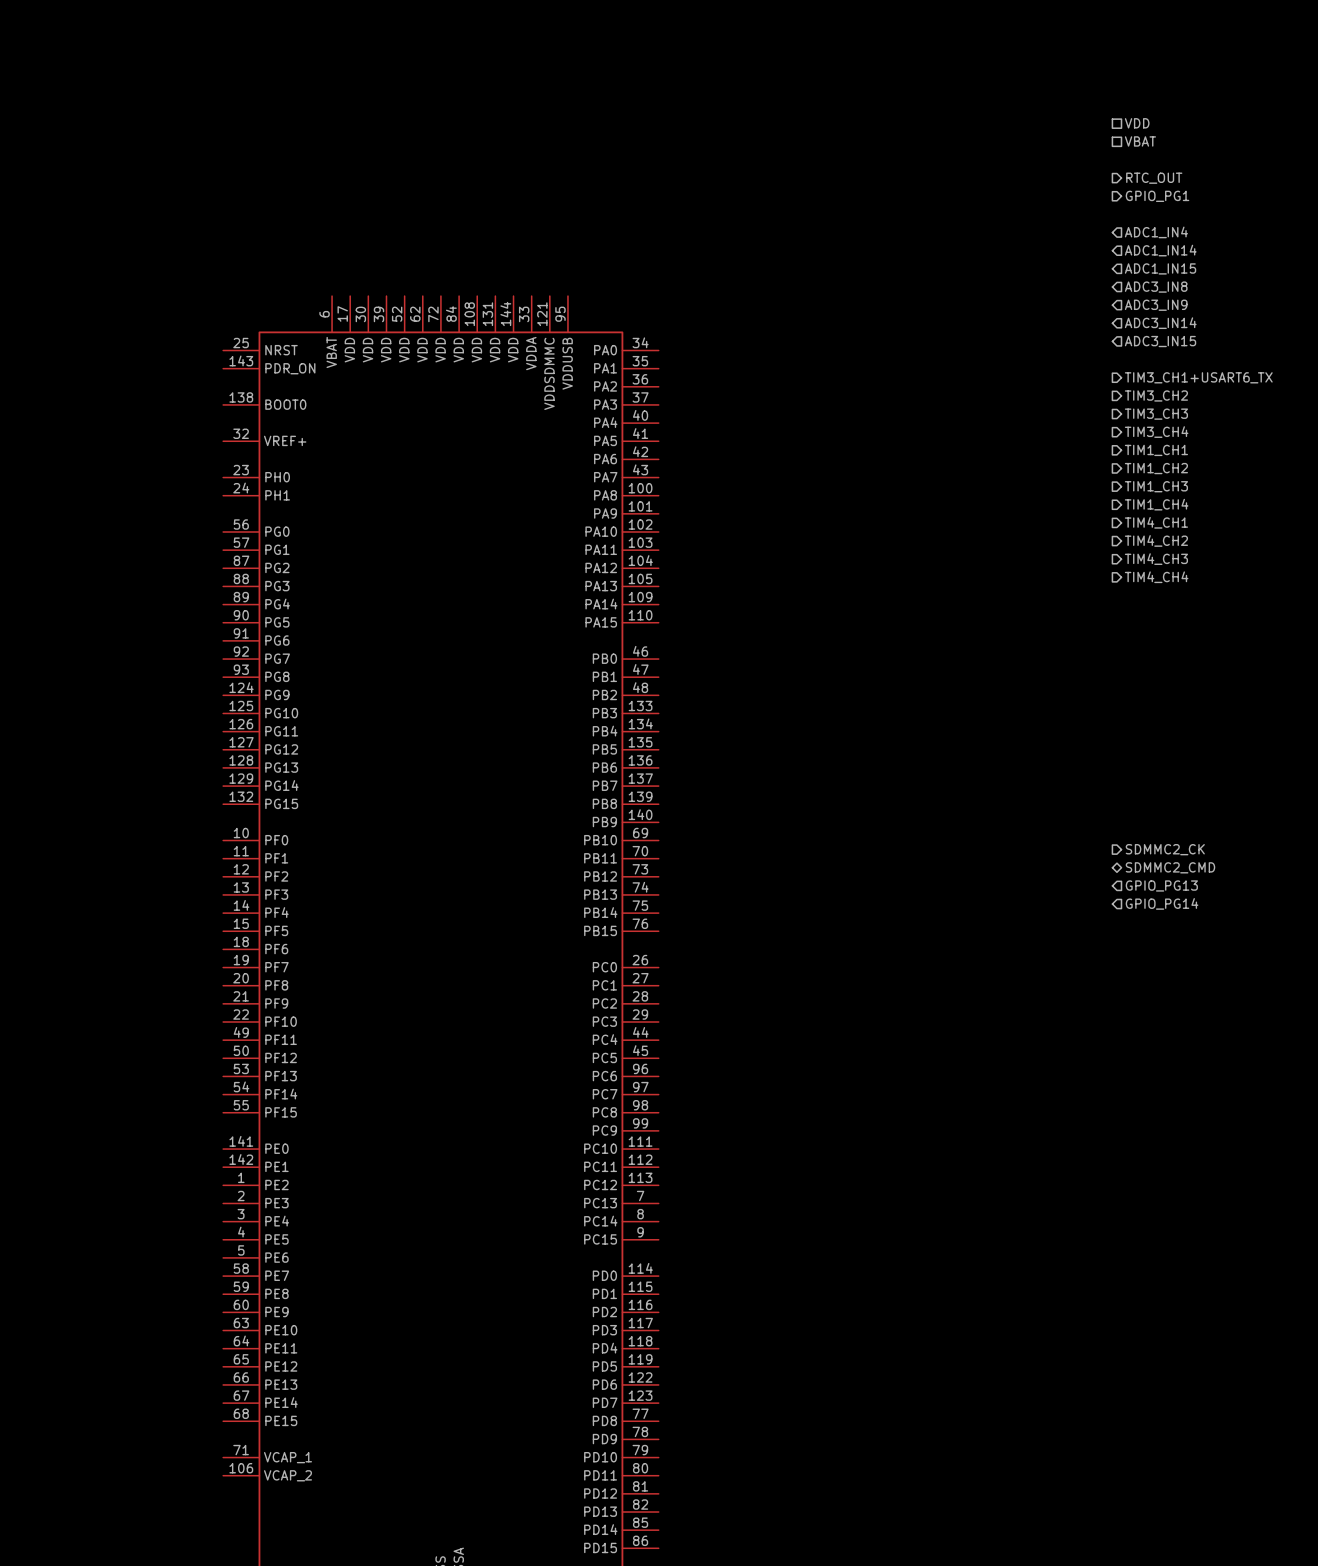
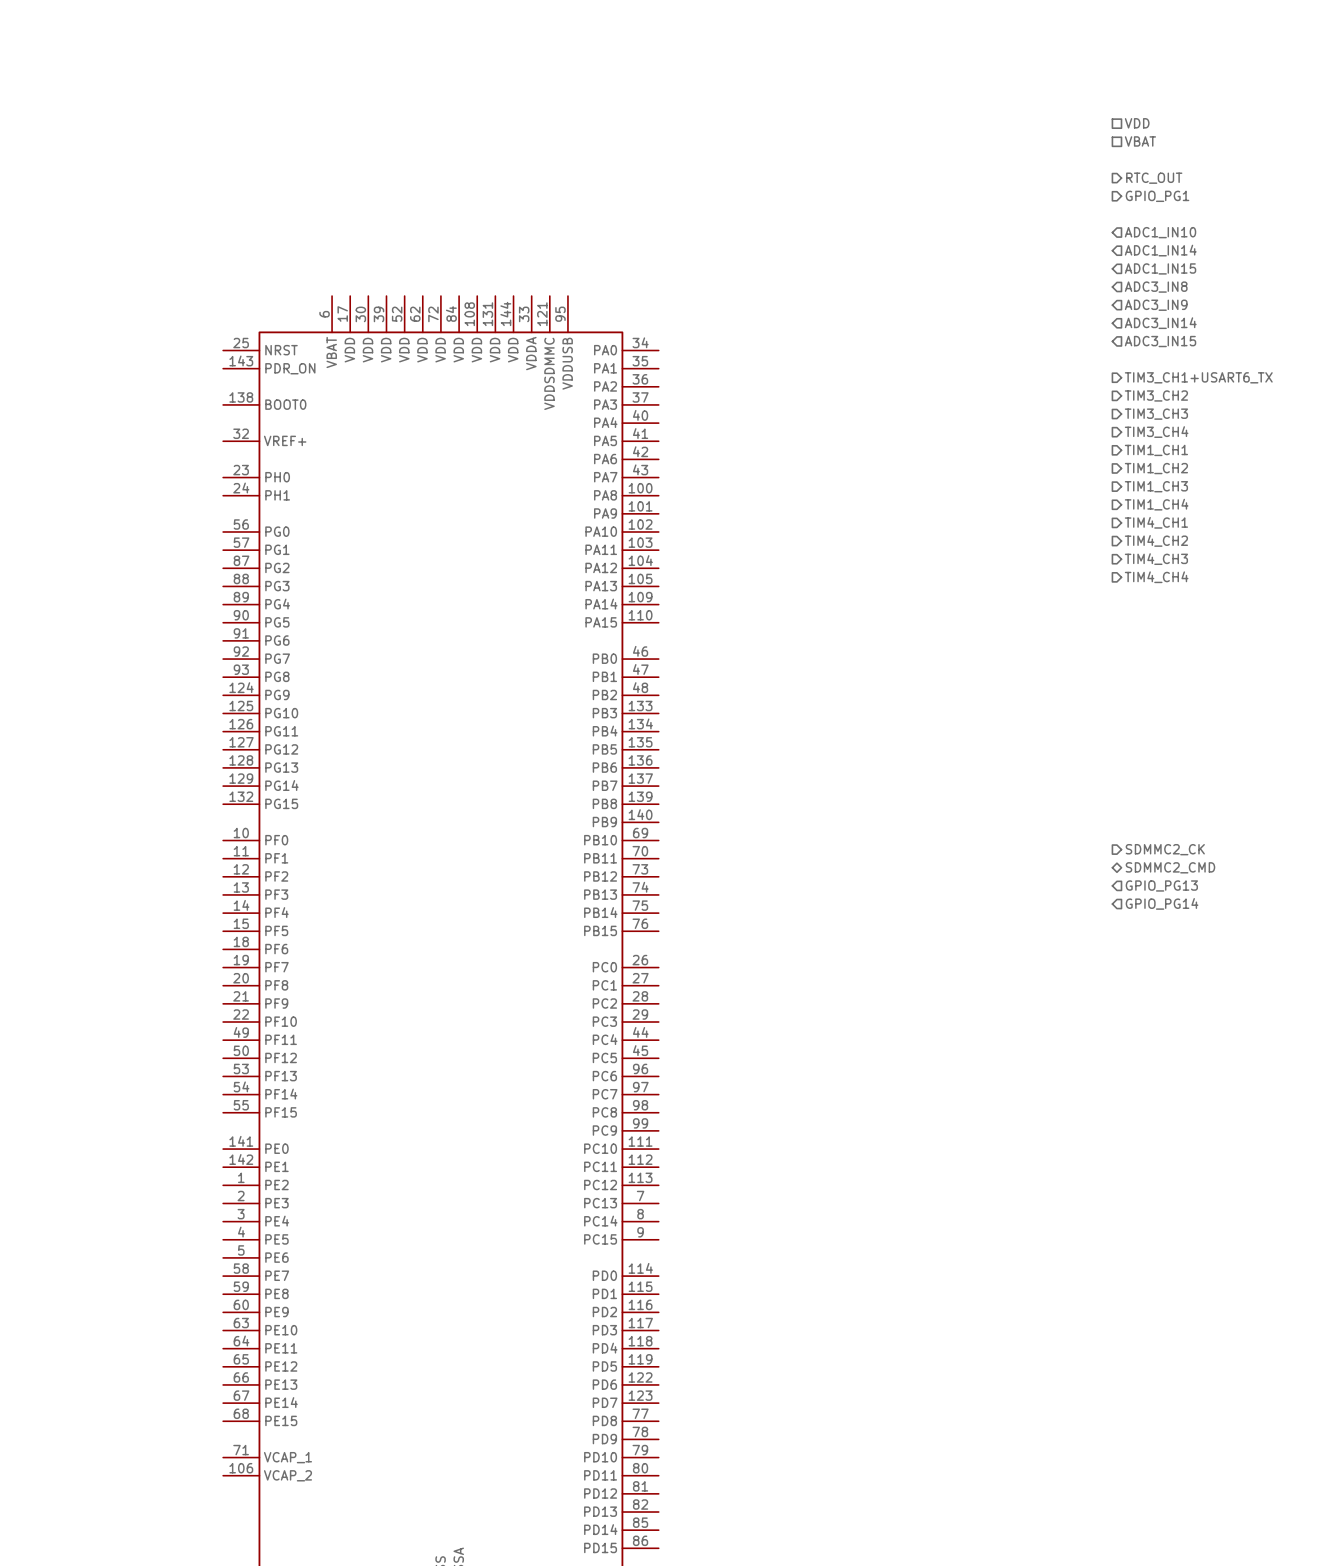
hierarchical label: ADC1_IN4 (1156, 232) -> ADC1_IN10 (1160, 232)

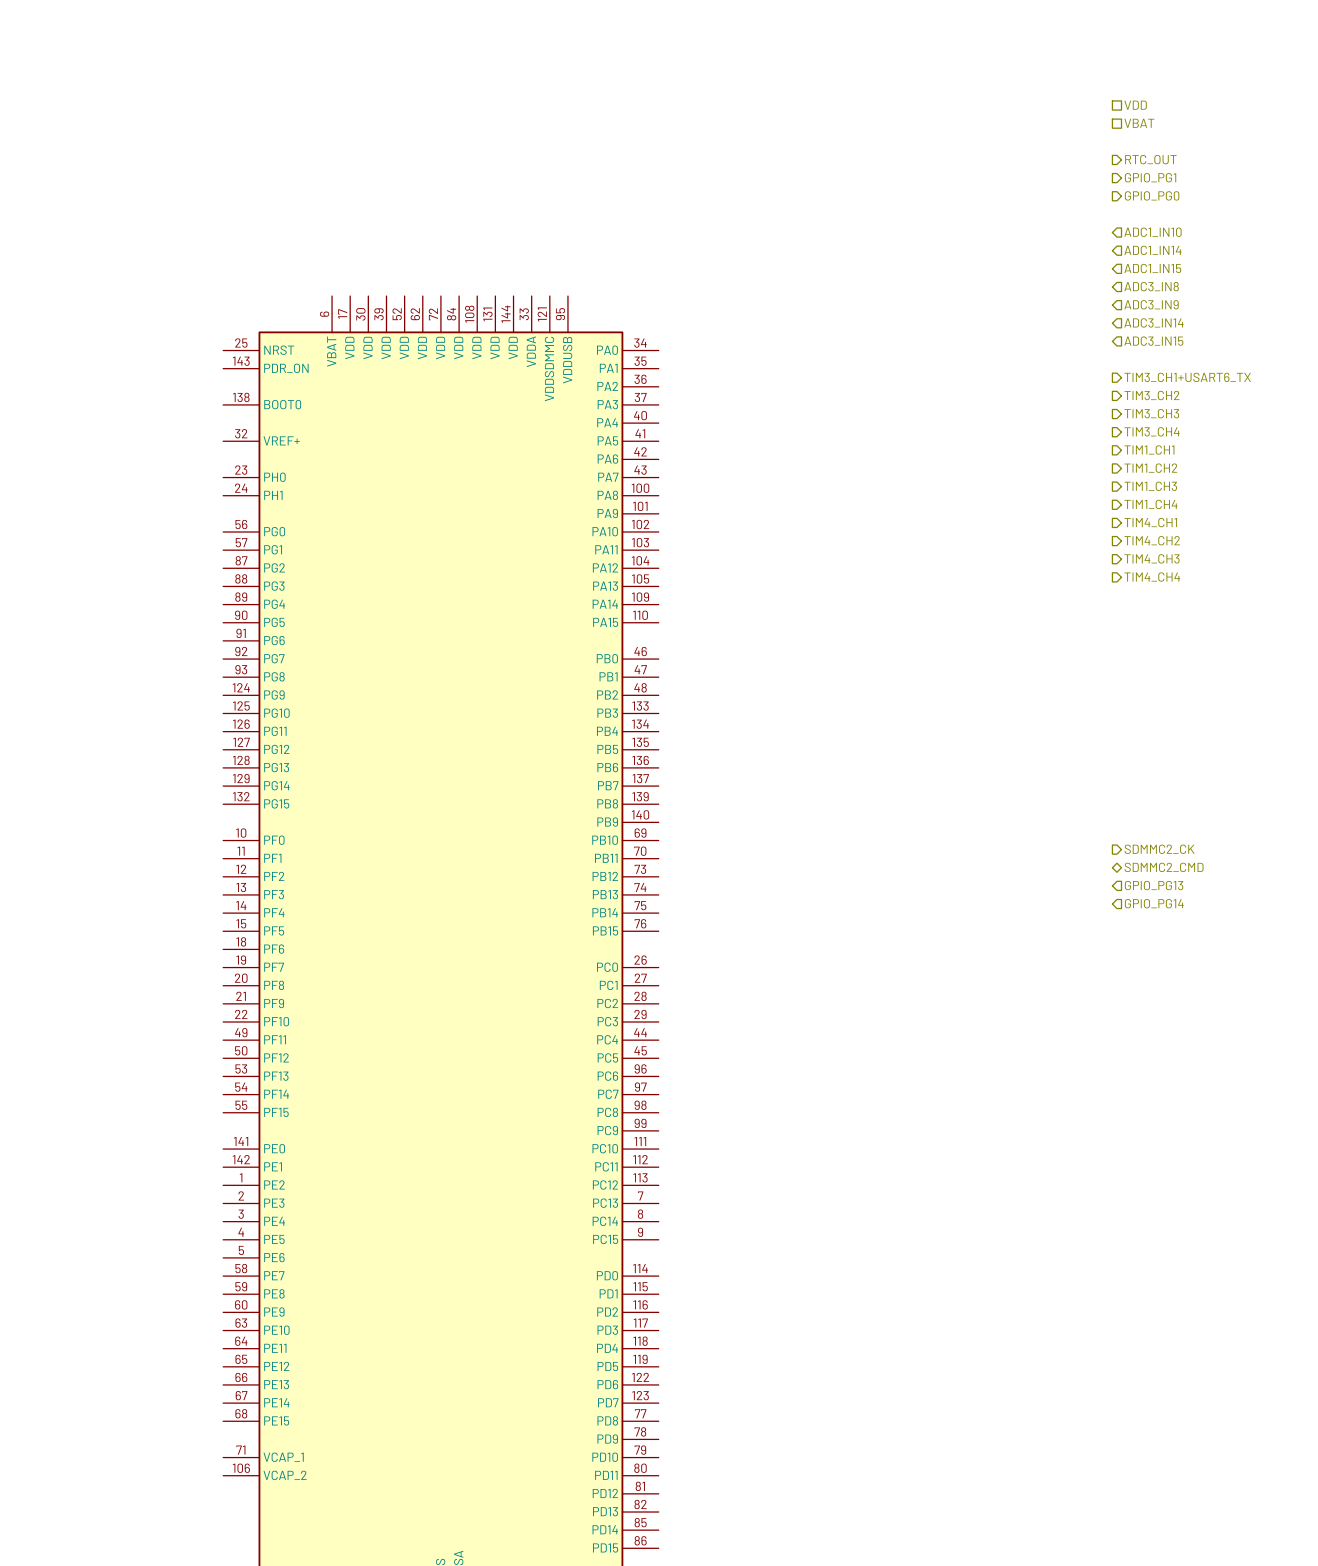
hierarchical label: none -> VDD (1135, 105)
hierarchical label: VDD (1137, 123) -> VBAT (1139, 123)
hierarchical label: VBAT (1140, 141) -> none
hierarchical label: none -> RTC_OUT (1150, 159)
hierarchical label: RTC_OUT (1154, 178) -> GPIO_PG1 (1150, 177)
hierarchical label: GPIO_PG1 (1157, 196) -> GPIO_PG0 (1152, 195)

